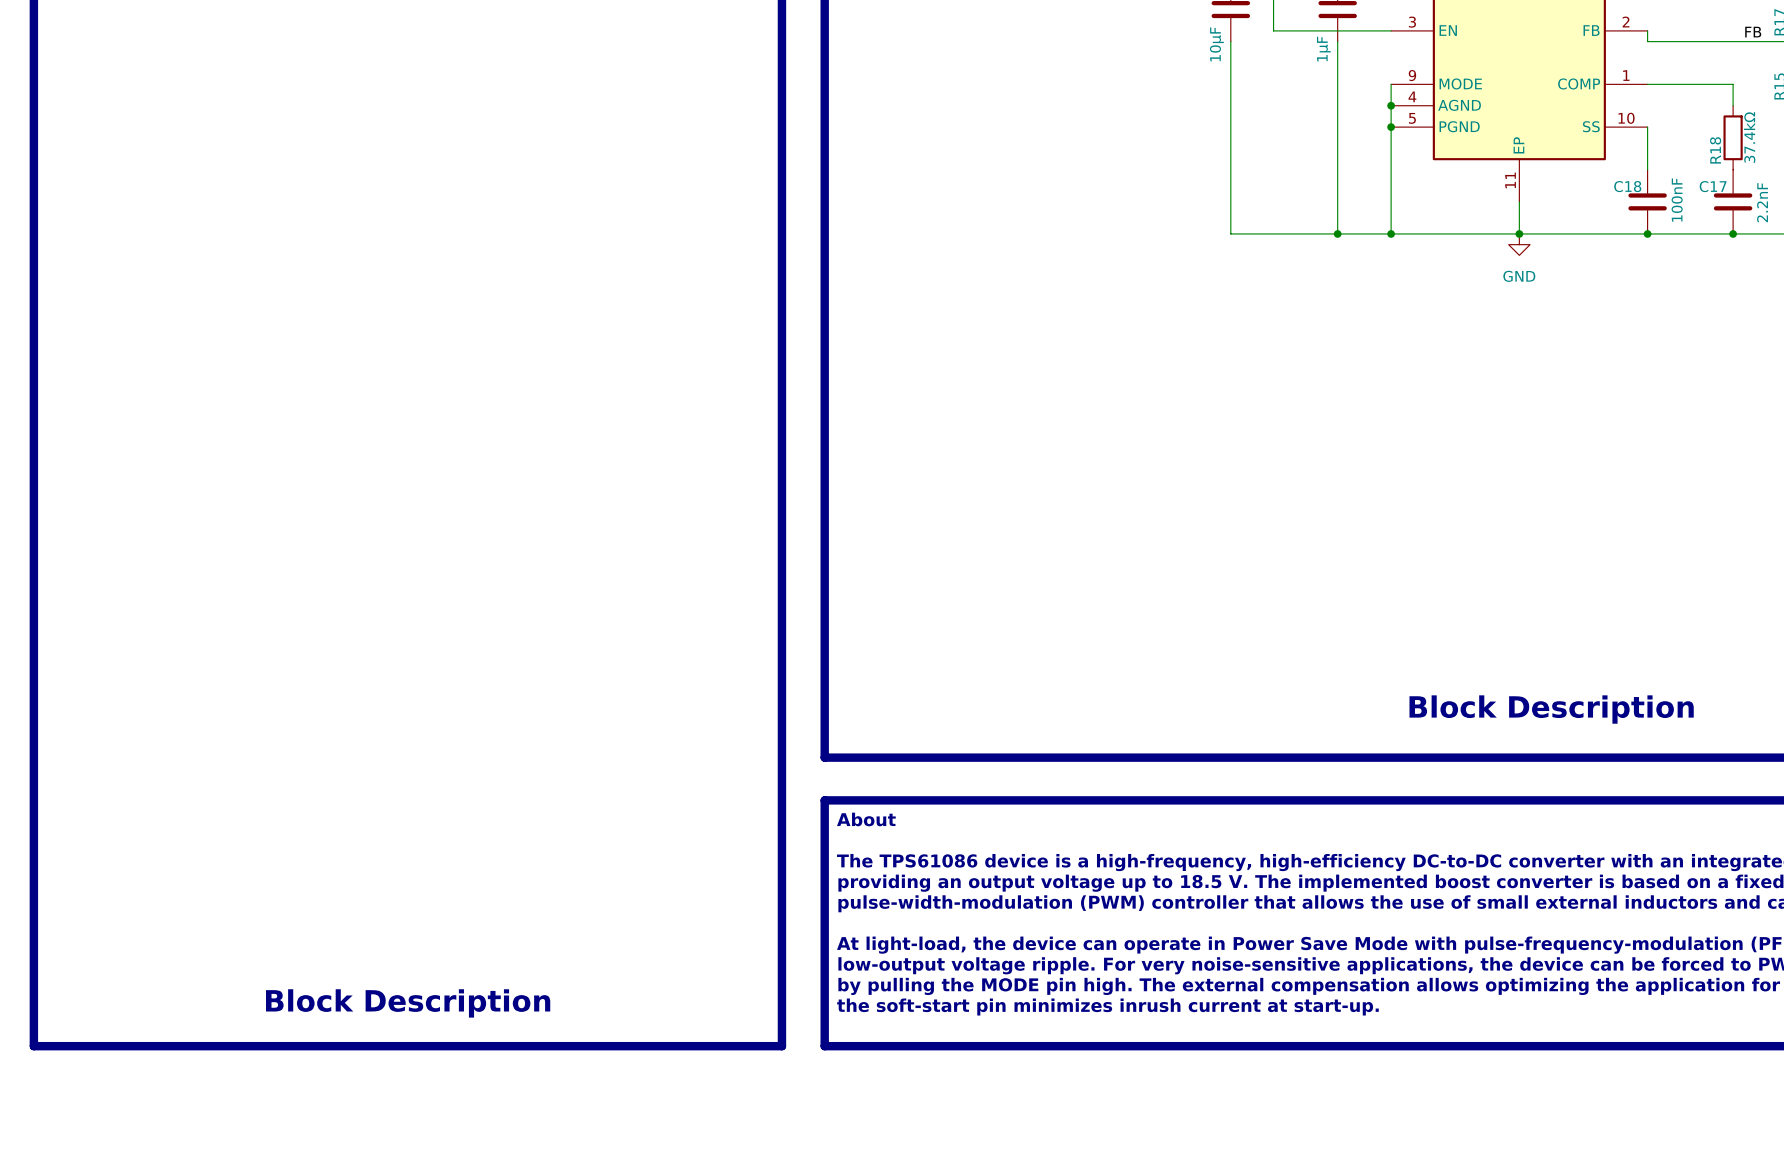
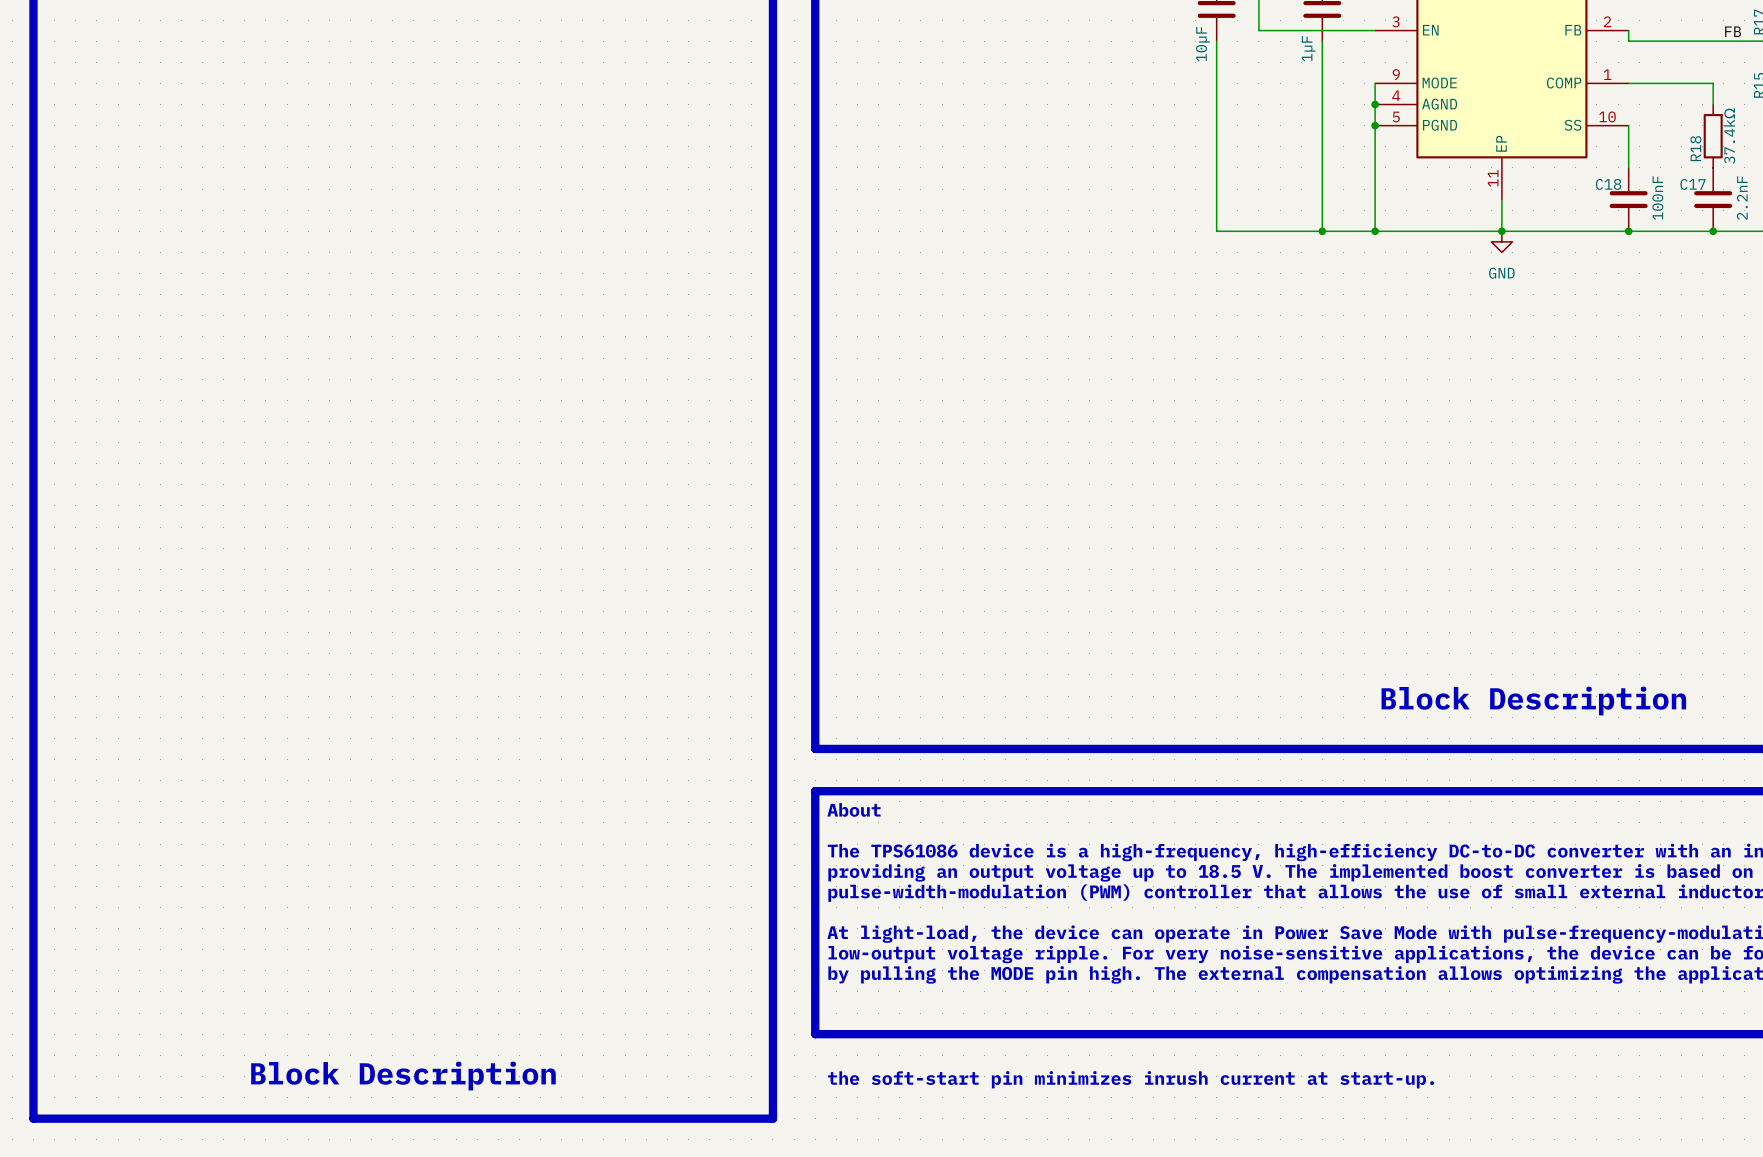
text position: Block Description (408, 1003) -> Block Description (403, 1076)
text position: the soft-start pin minimizes inrush current at start-up. (1107, 1007) -> the soft-start pin minimizes inrush current at start-up. (1131, 1079)
line: (33, 1046) (781, 1046) -> (33, 1034) (33, 1118) (772, 1118) (772, 1034)

